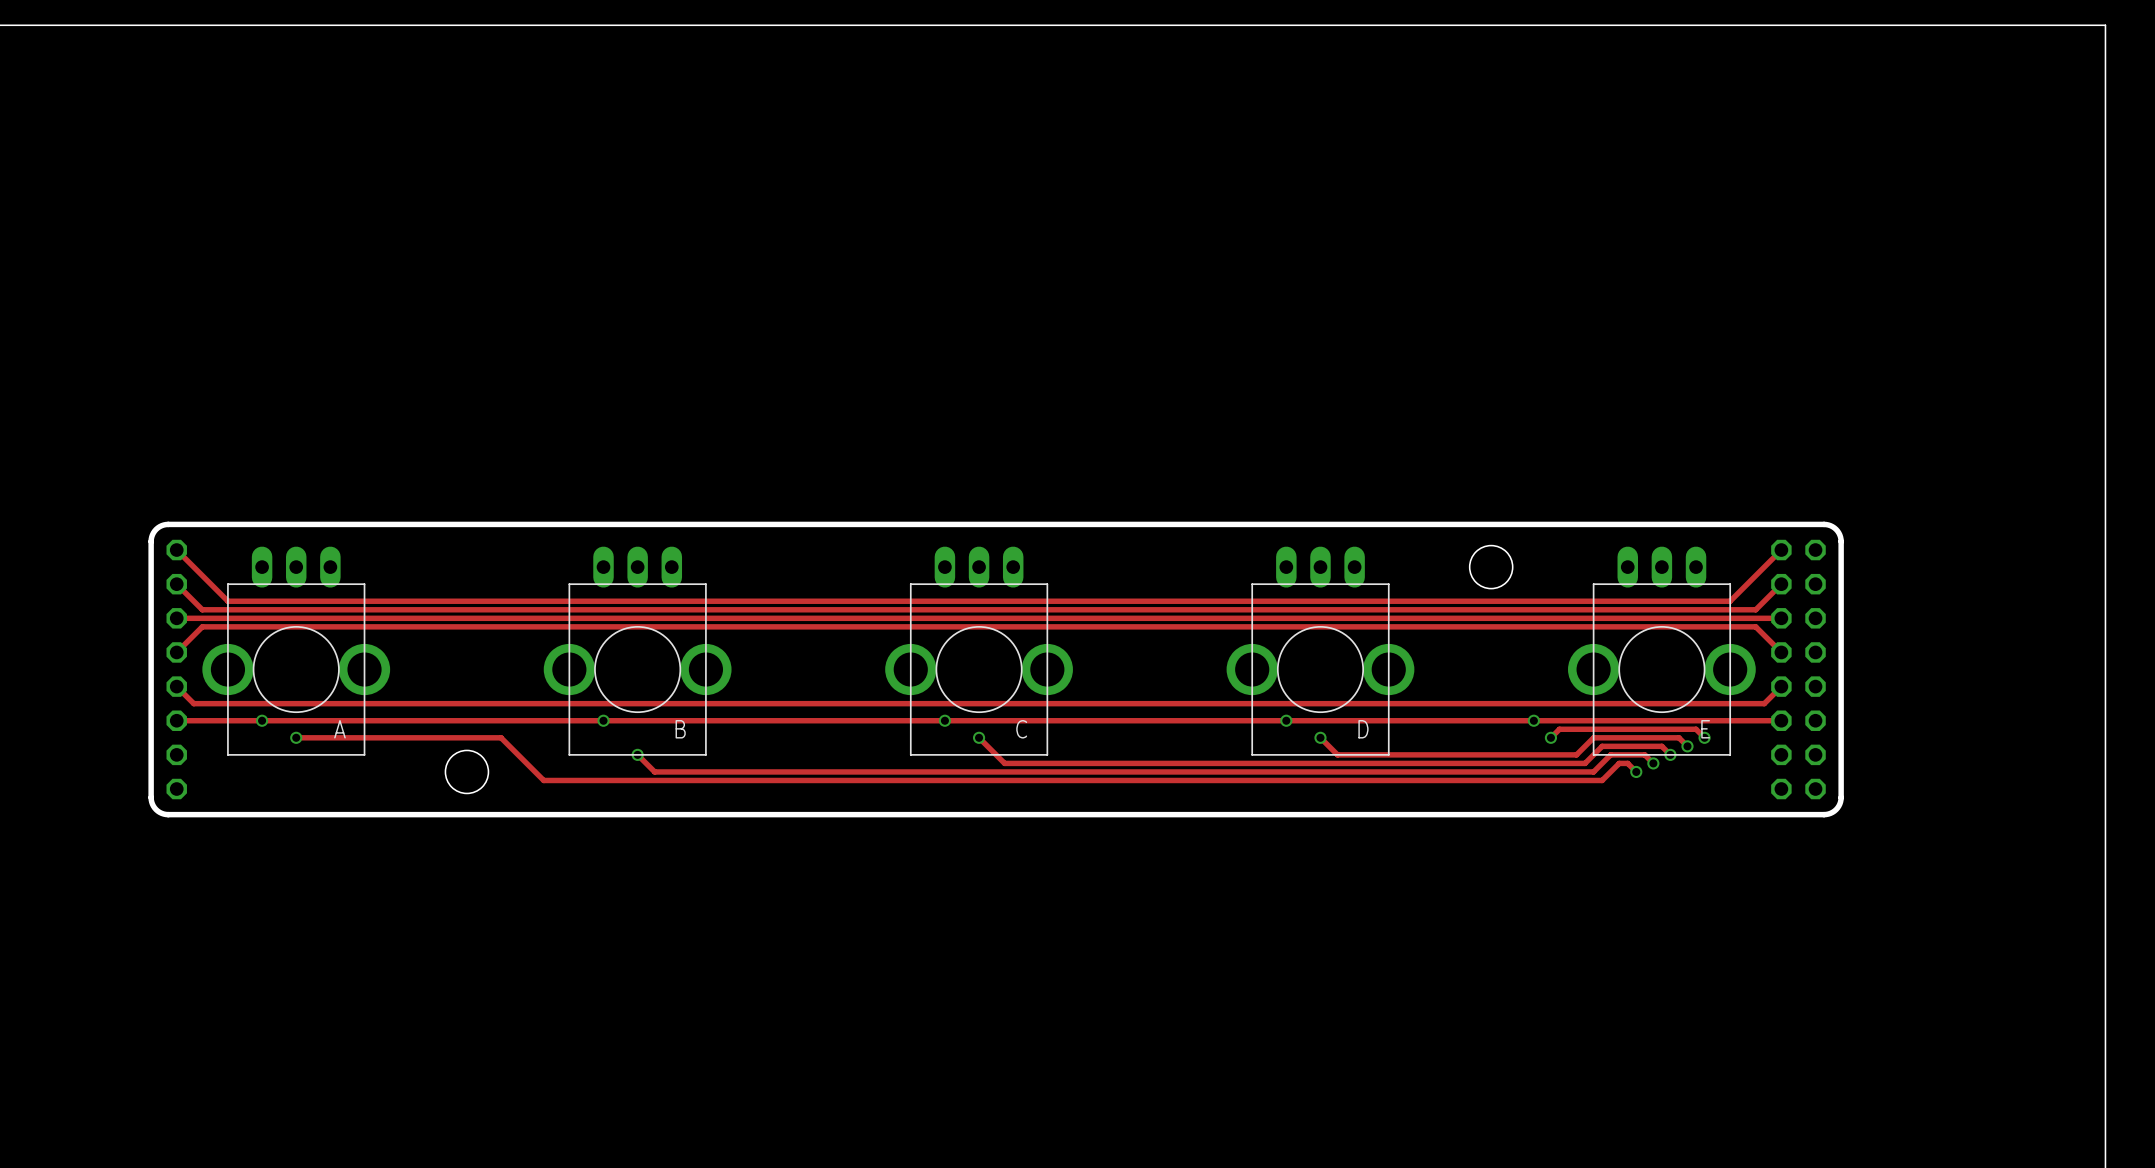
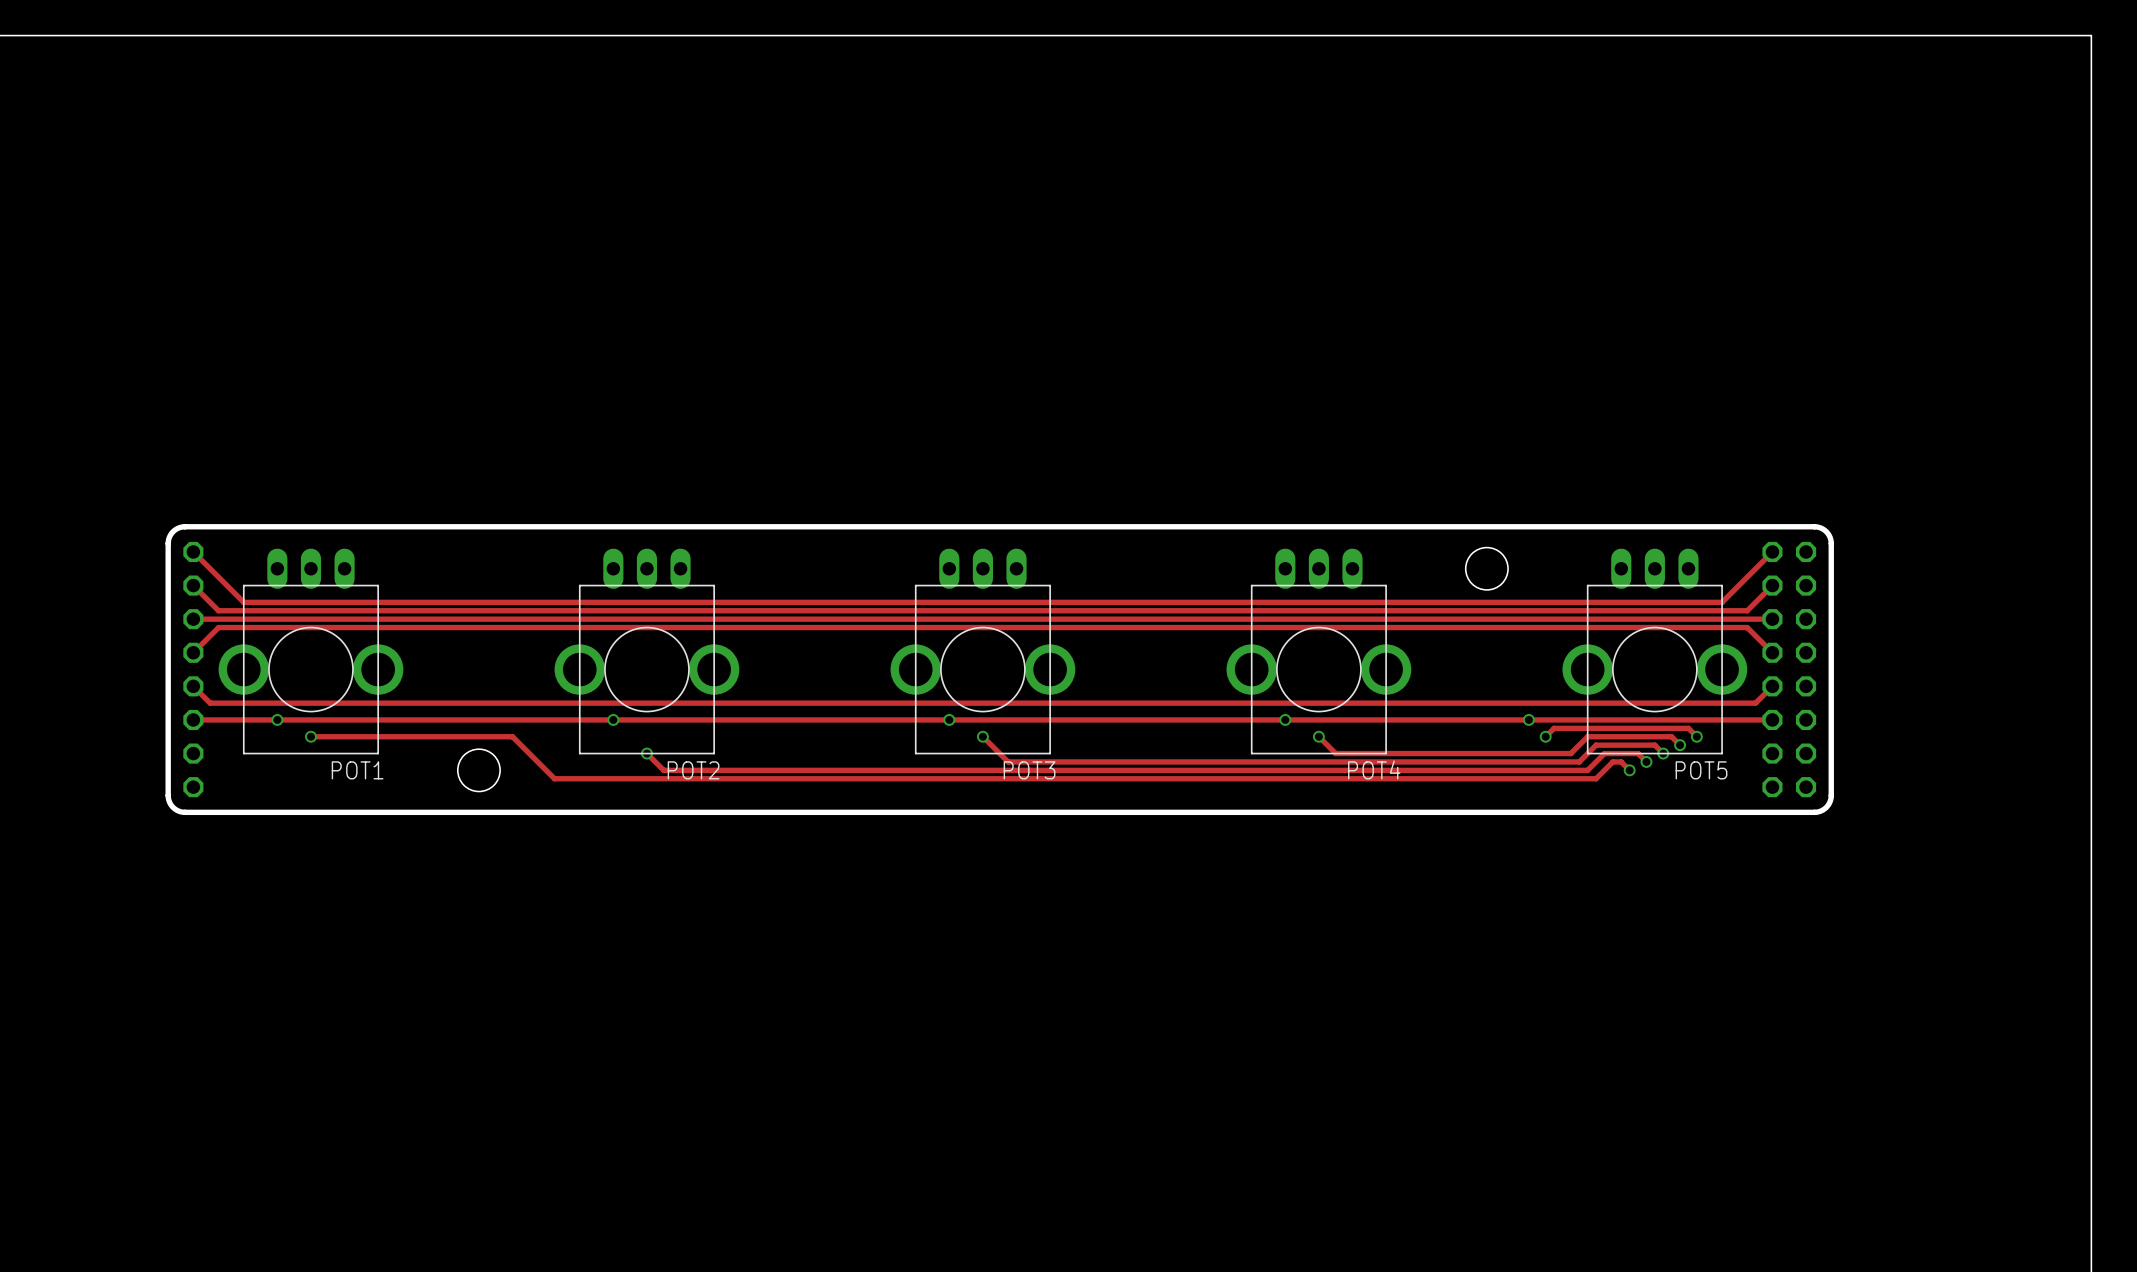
A name: A (339, 729) -> POT1 (357, 770)
B name: B (680, 729) -> POT2 (693, 770)
C name: C (1021, 729) -> POT3 (1029, 770)
D name: D (1363, 729) -> POT4 (1374, 769)
E name: E (1705, 729) -> POT5 (1701, 770)

